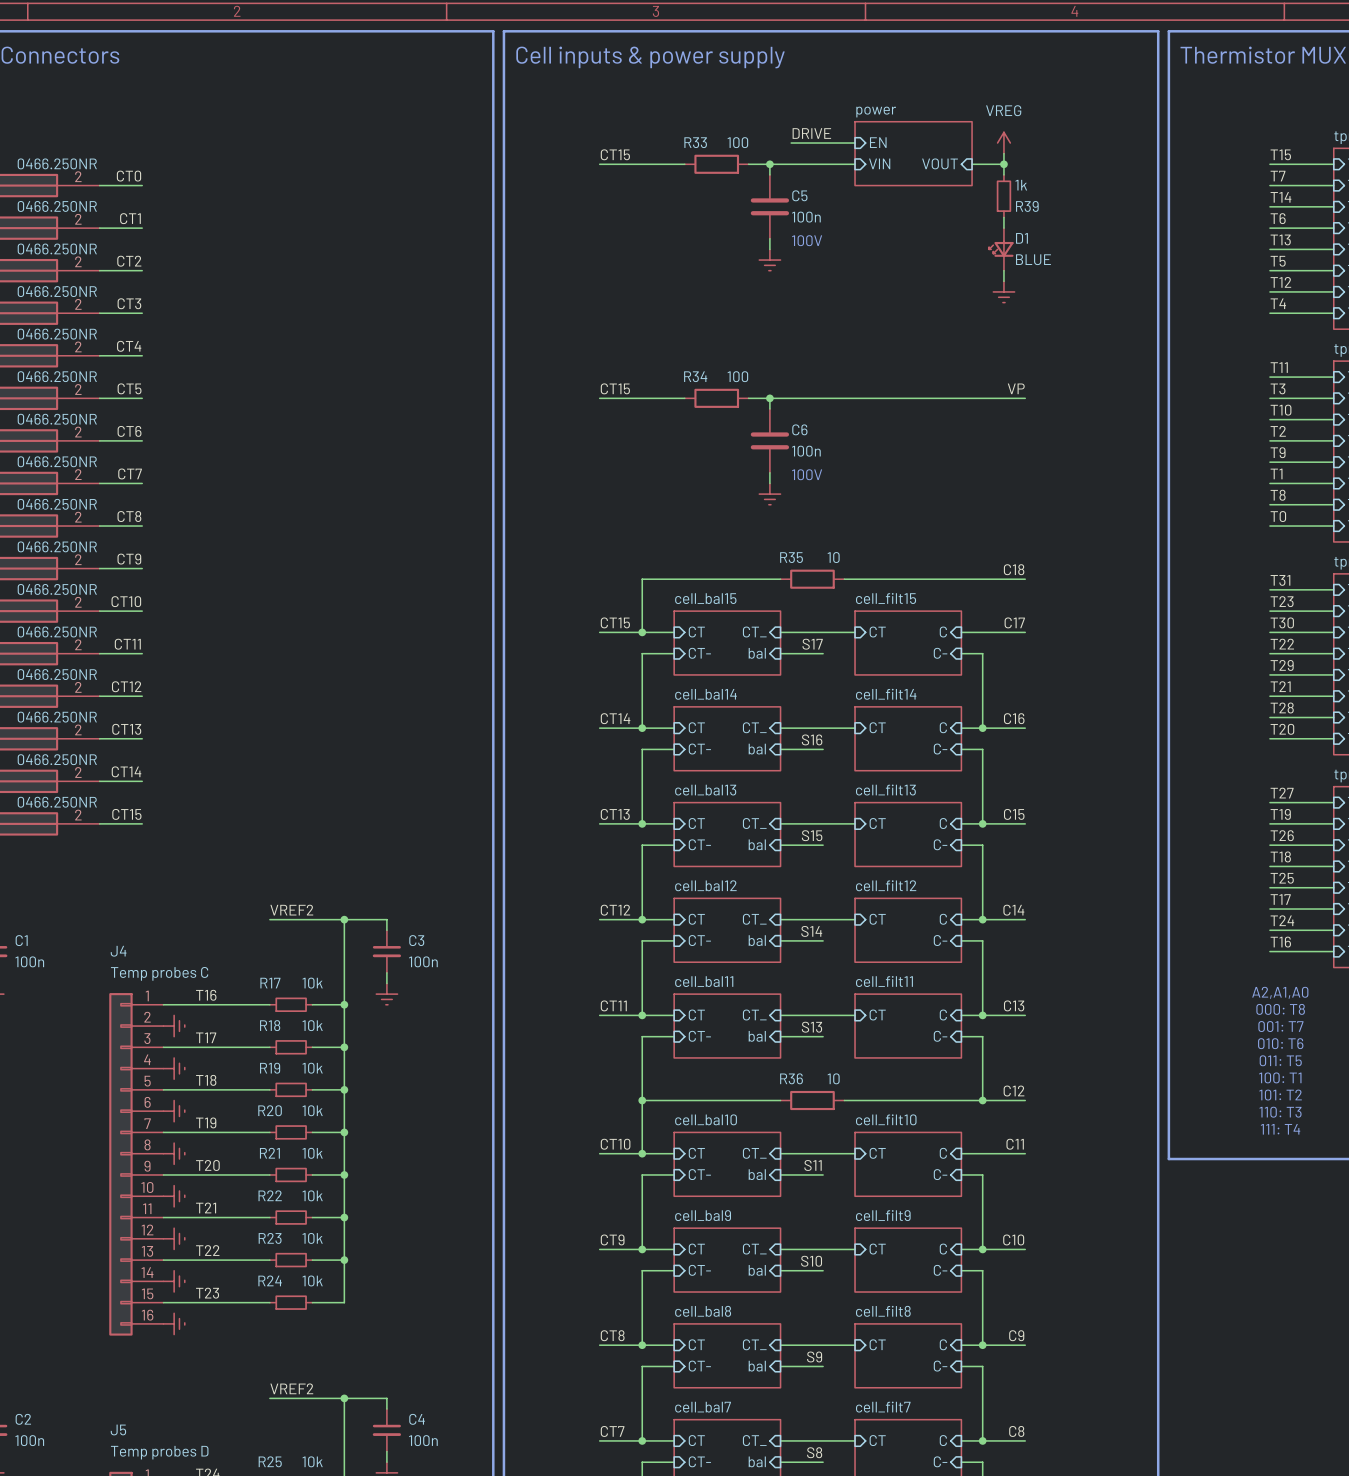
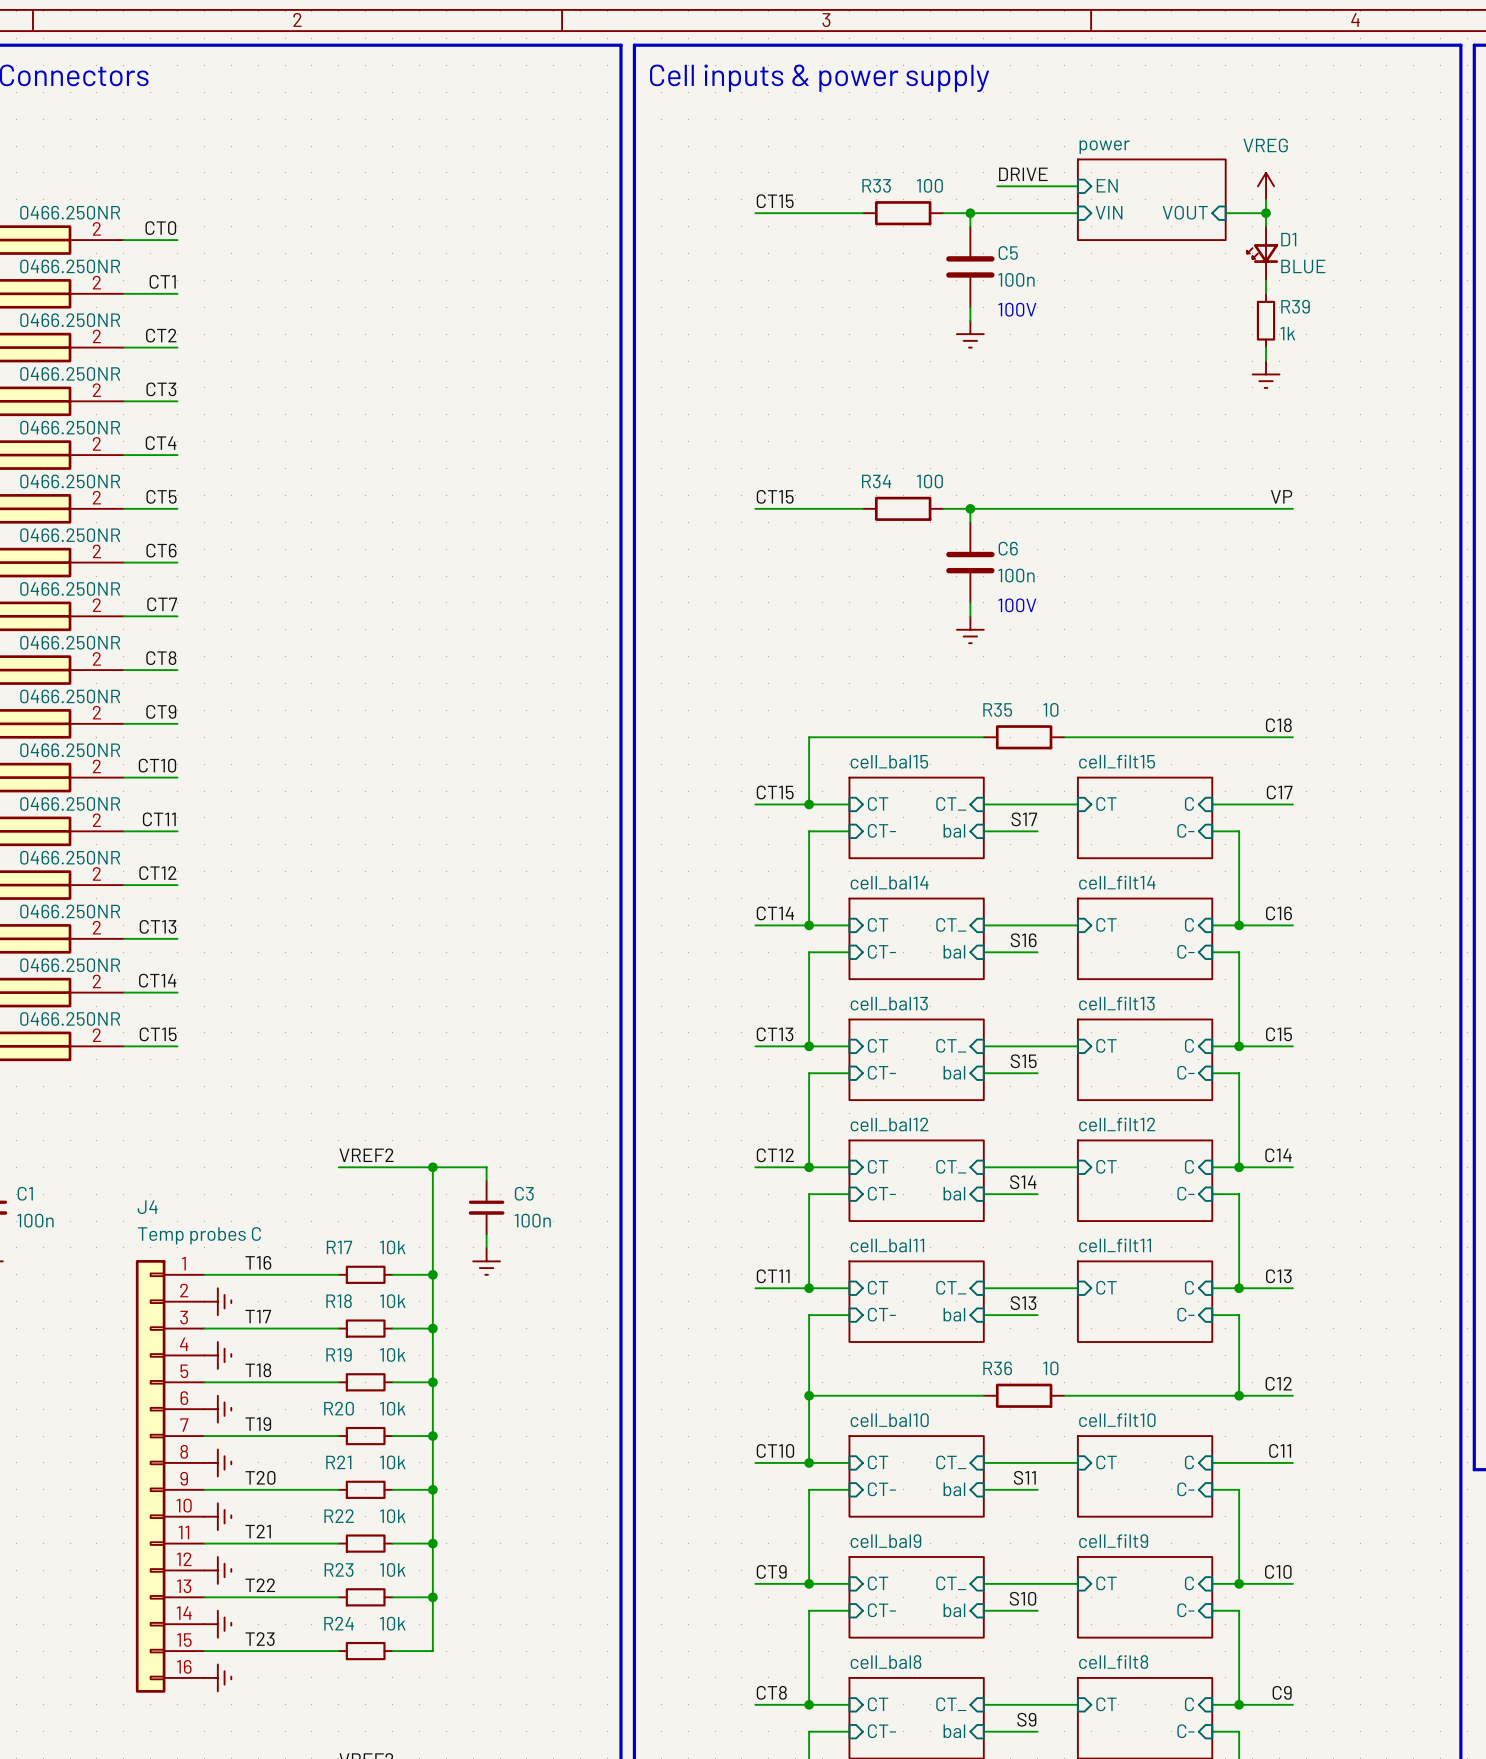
R39 value position: 1k (1021, 185) -> 1k (1287, 333)
R39 position: (1003, 196) -> (1266, 320)
R39 name position: R39 (1027, 206) -> R39 (1295, 306)
D1 position: (1001, 249) -> (1262, 253)

